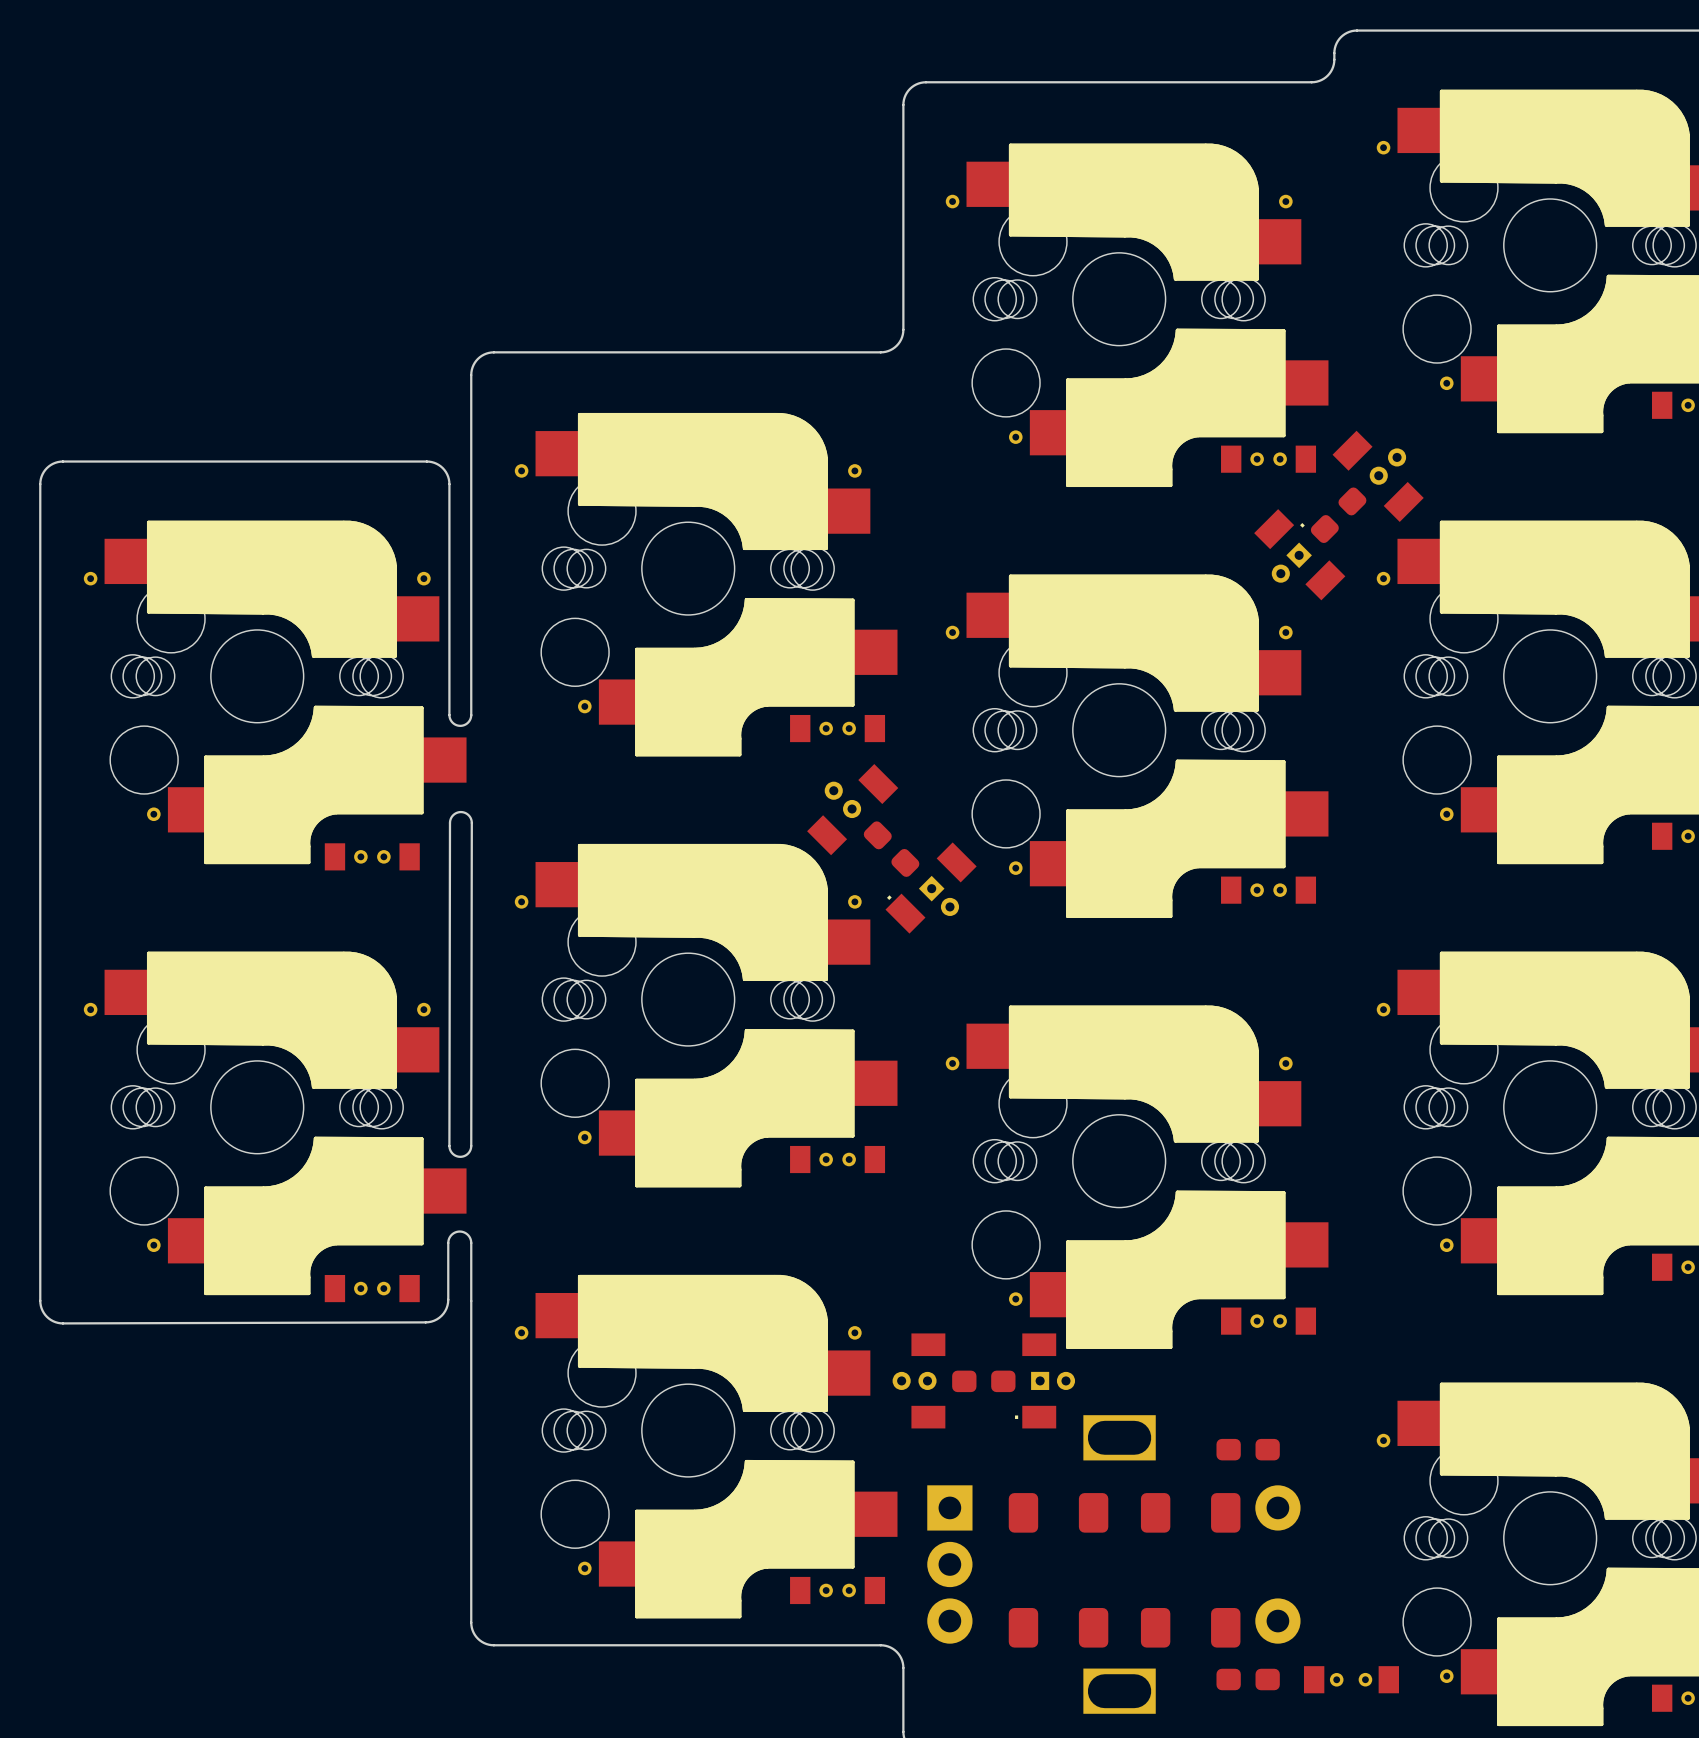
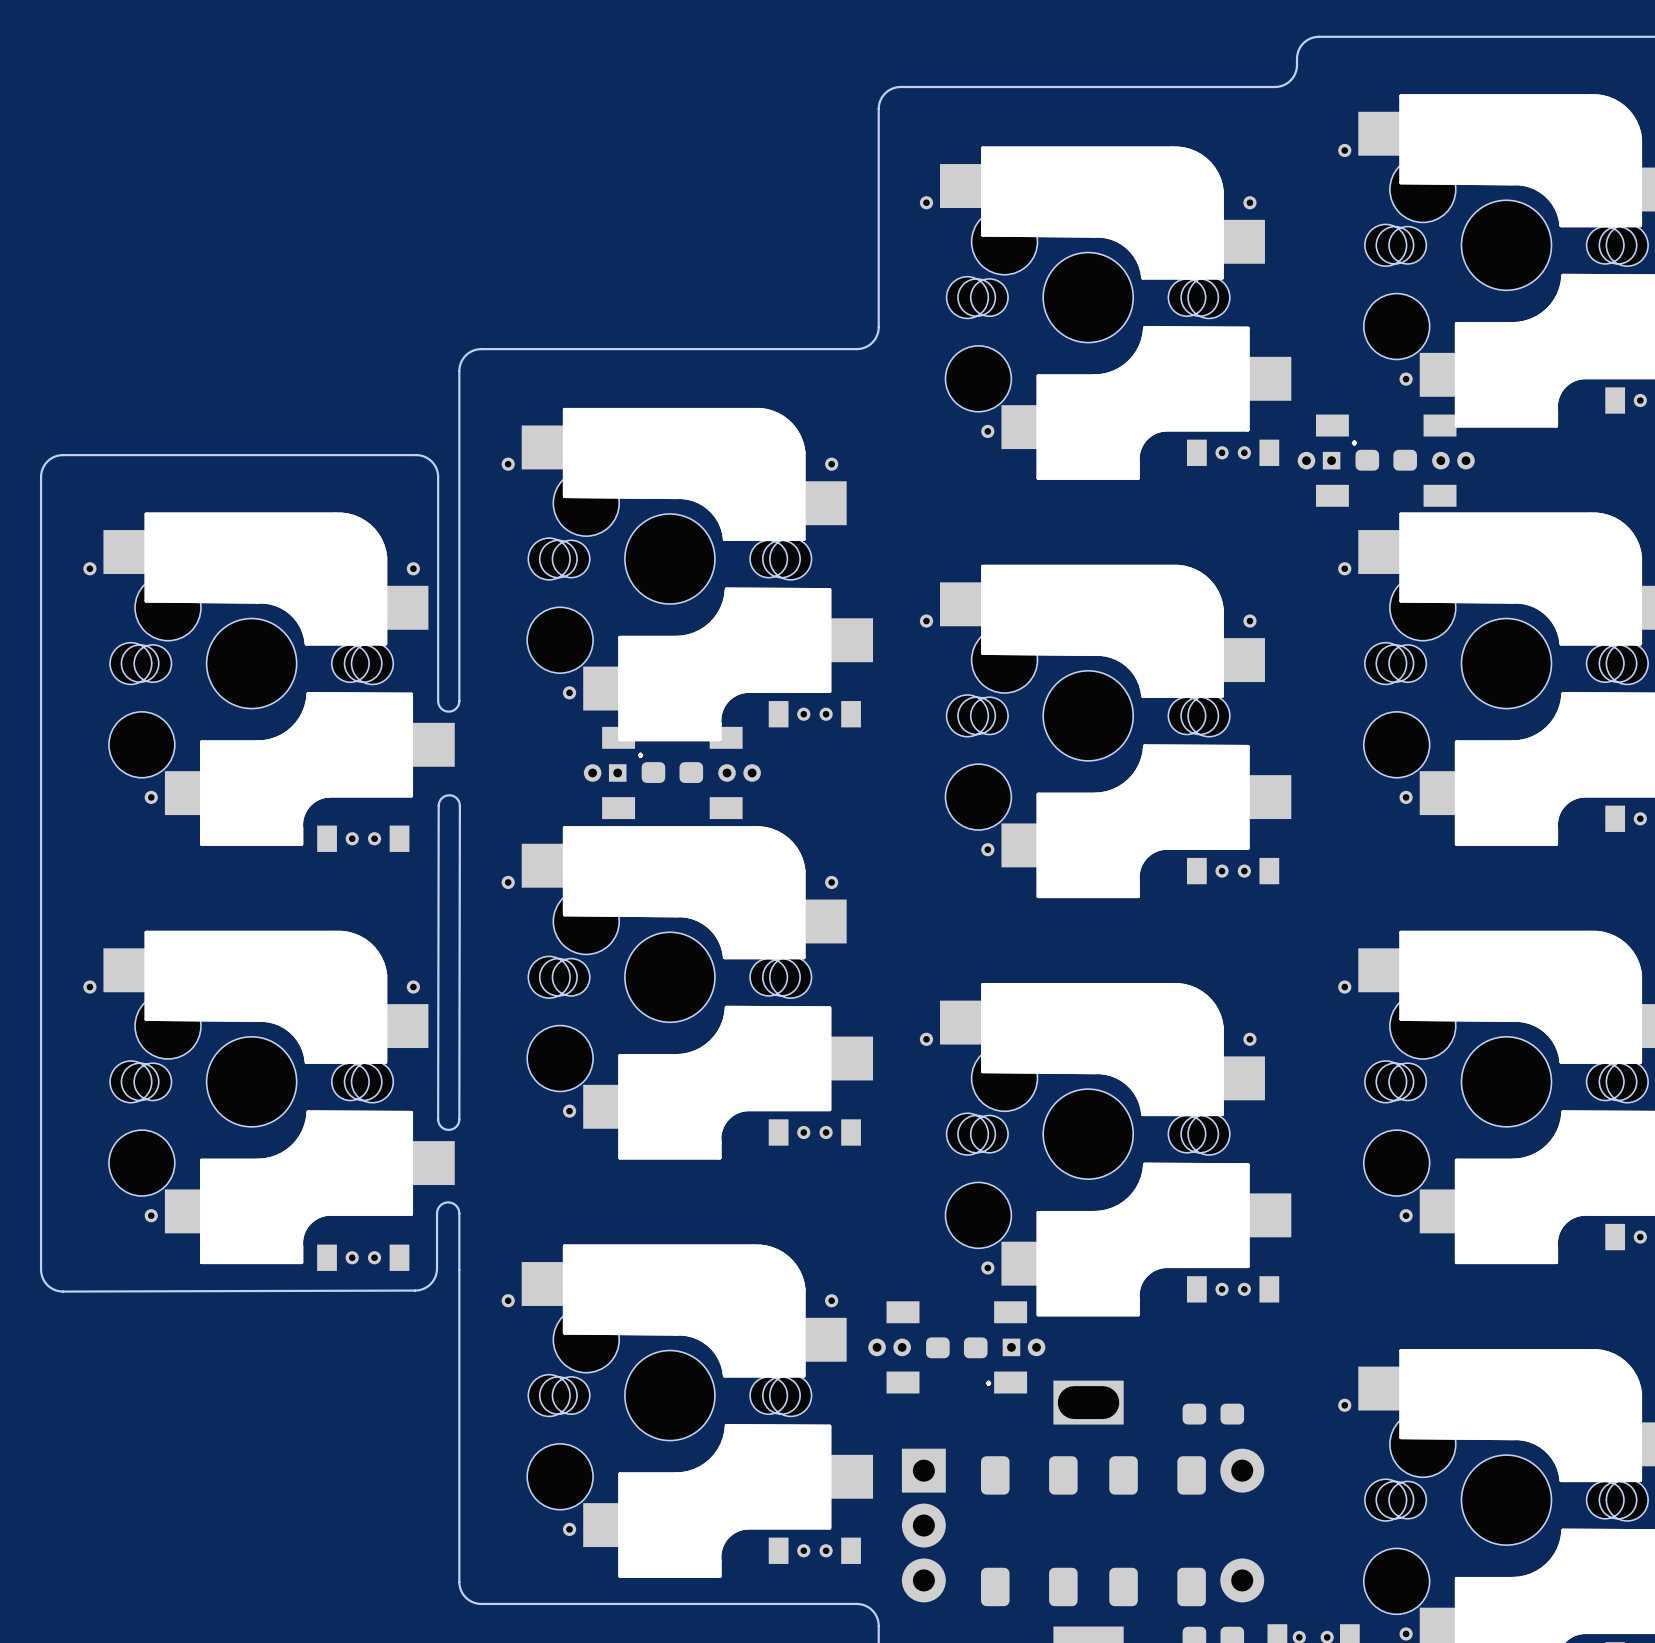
part: none -> (1386, 460)
part: (1338, 515) -> none
part: none -> (672, 772)
part: (891, 848) -> none

